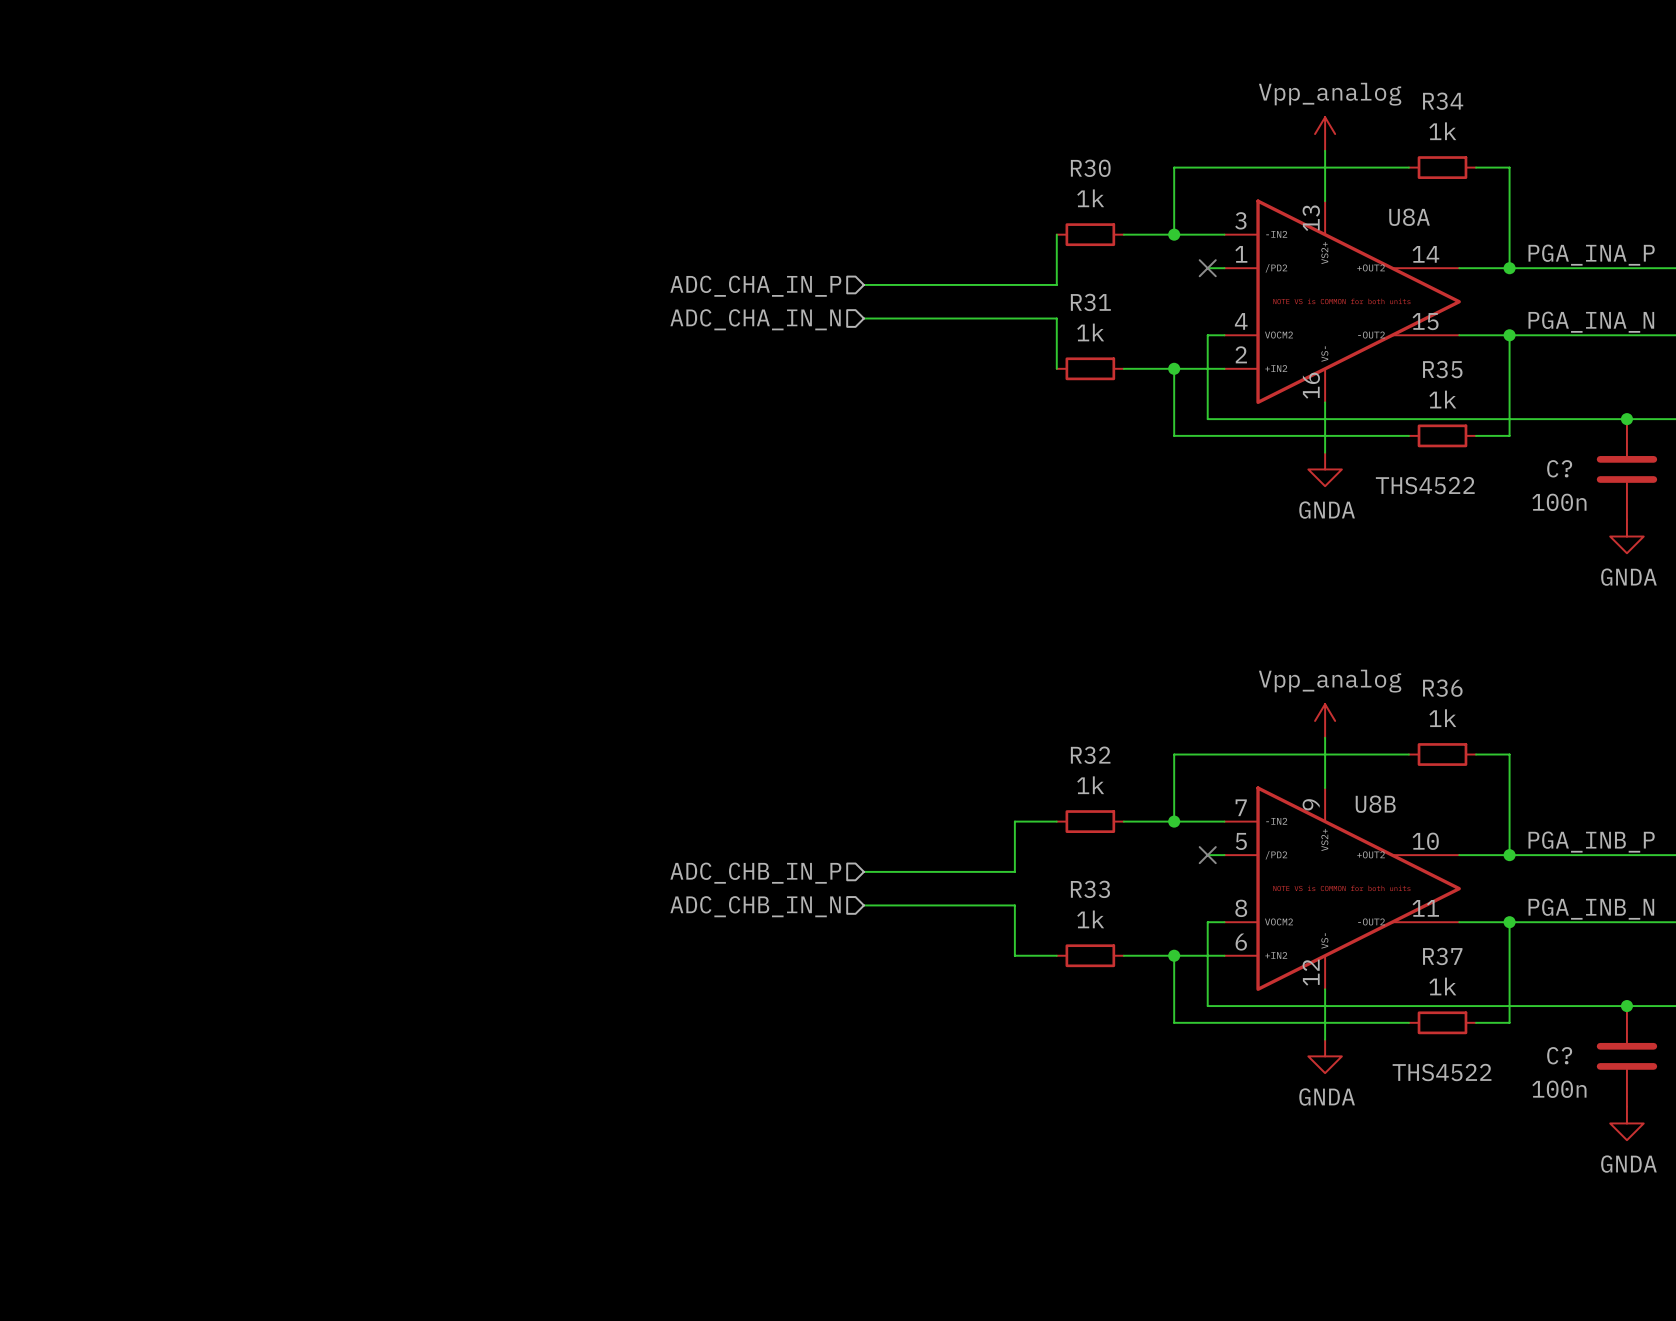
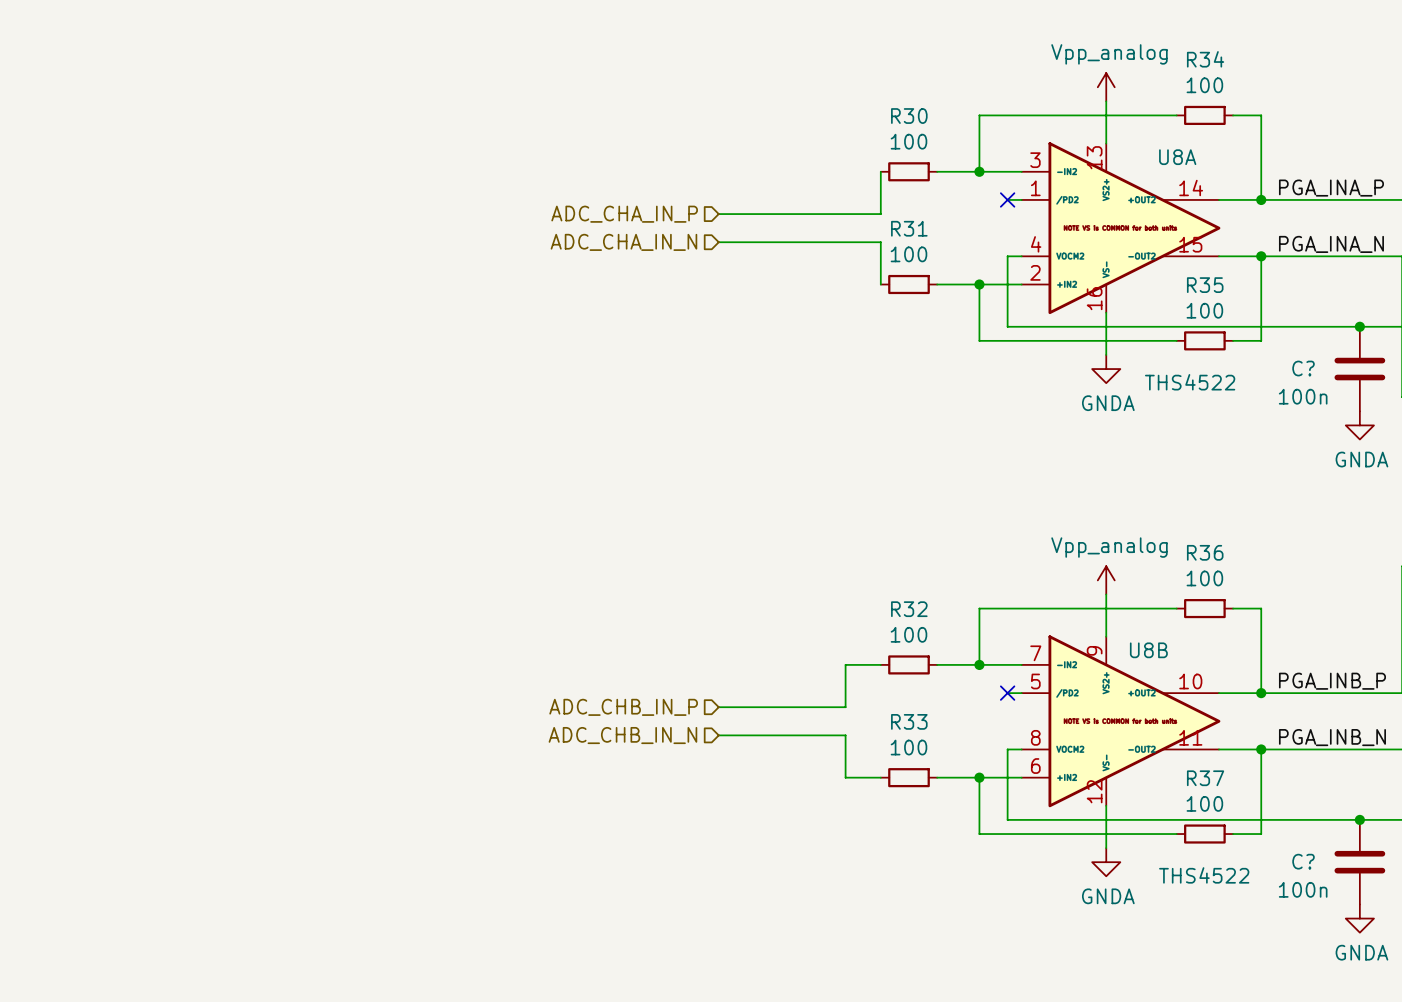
R34 value: 1k (1442, 131) -> 100 (1204, 85)
R30 value: 1k (1090, 198) -> 100 (908, 141)
R31 value: 1k (1090, 332) -> 100 (908, 254)
R35 value: 1k (1442, 399) -> 100 (1204, 310)
R36 value: 1k (1442, 718) -> 100 (1204, 578)
R32 value: 1k (1090, 785) -> 100 (908, 634)
R33 value: 1k (1090, 919) -> 100 (908, 747)
R37 value: 1k (1442, 986) -> 100 (1204, 803)

